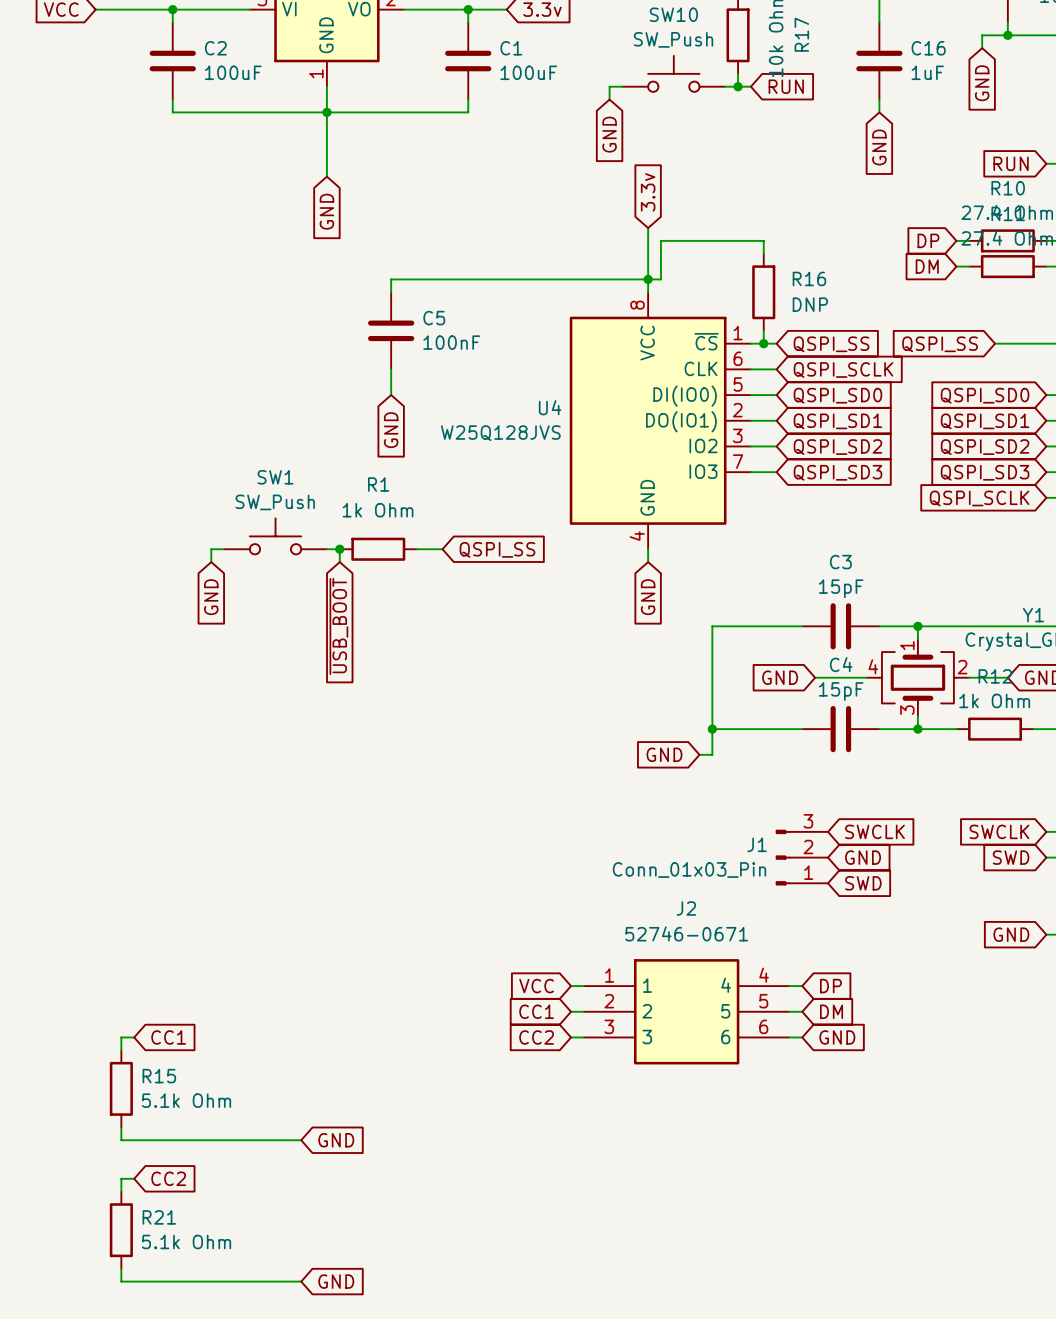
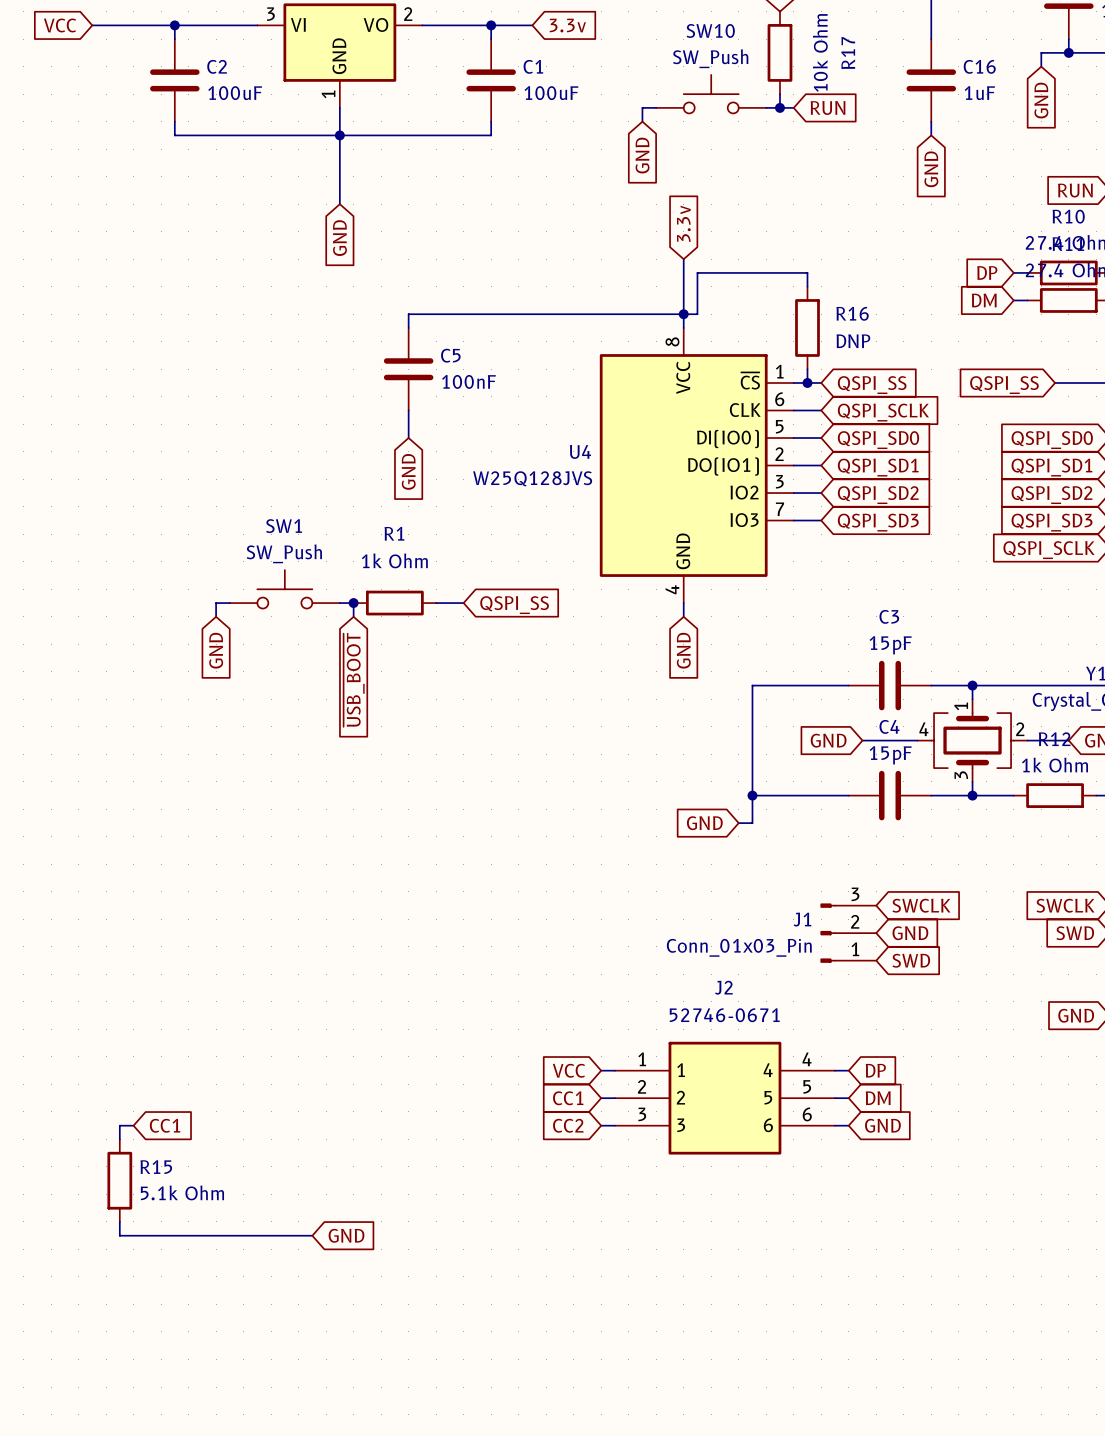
wire: (134, 1178) (121, 1178) (121, 1191) -> none
global label: CC2 (168, 1178) -> none
R21: 5.1k Ohm (121, 1230) -> none
wire: (121, 1268) (121, 1281) (301, 1281) -> none
global label: GND (336, 1281) -> none

